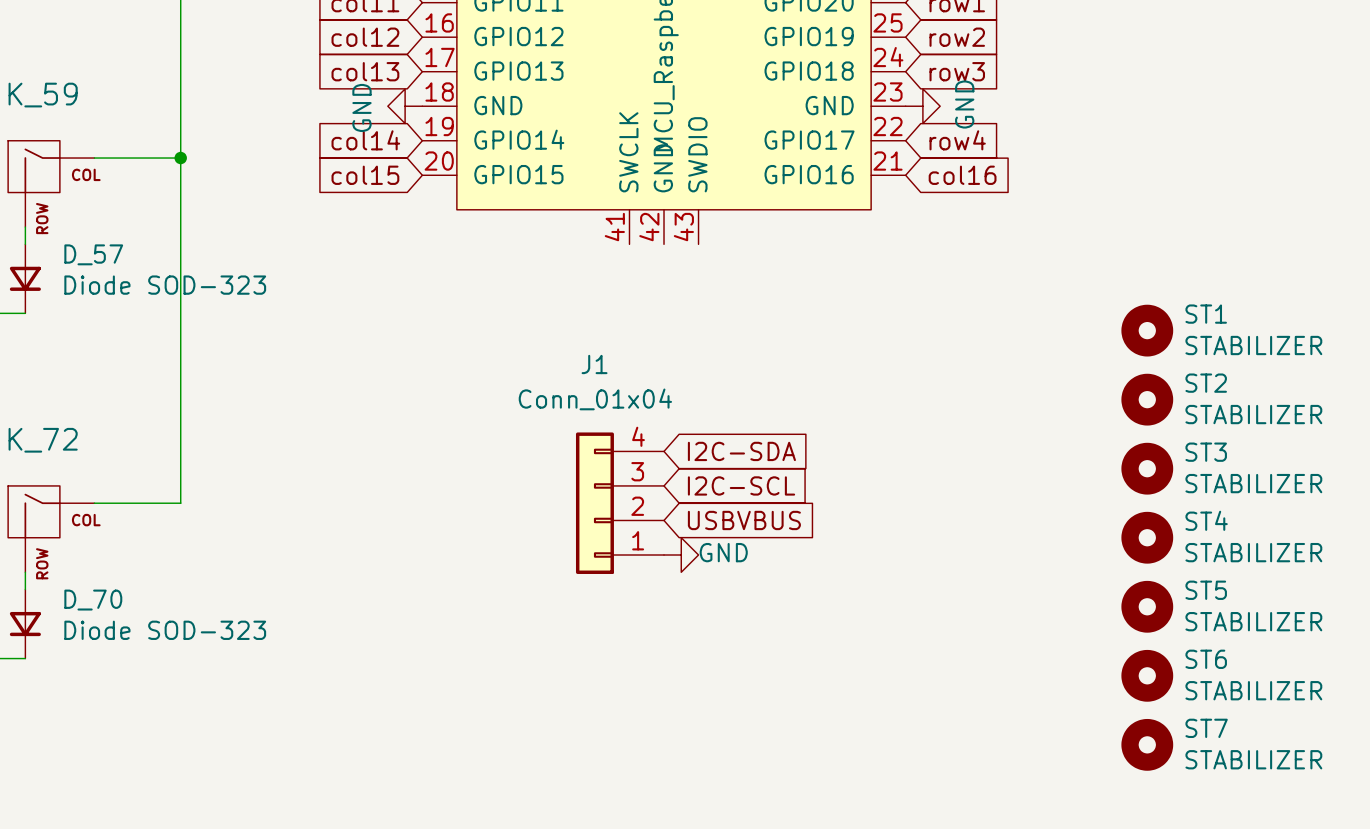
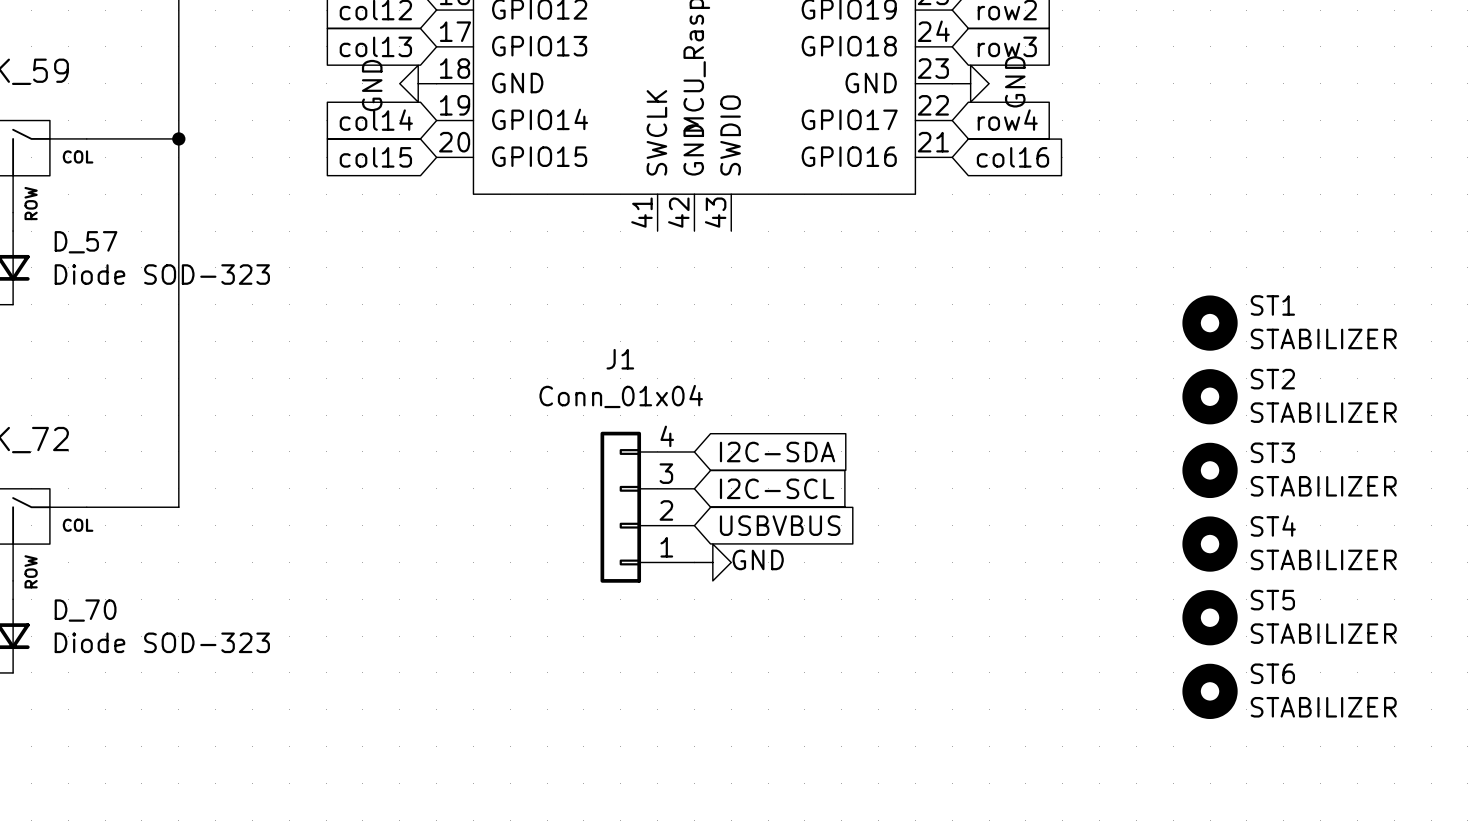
ST7: STABILIZER (1147, 744) -> none

